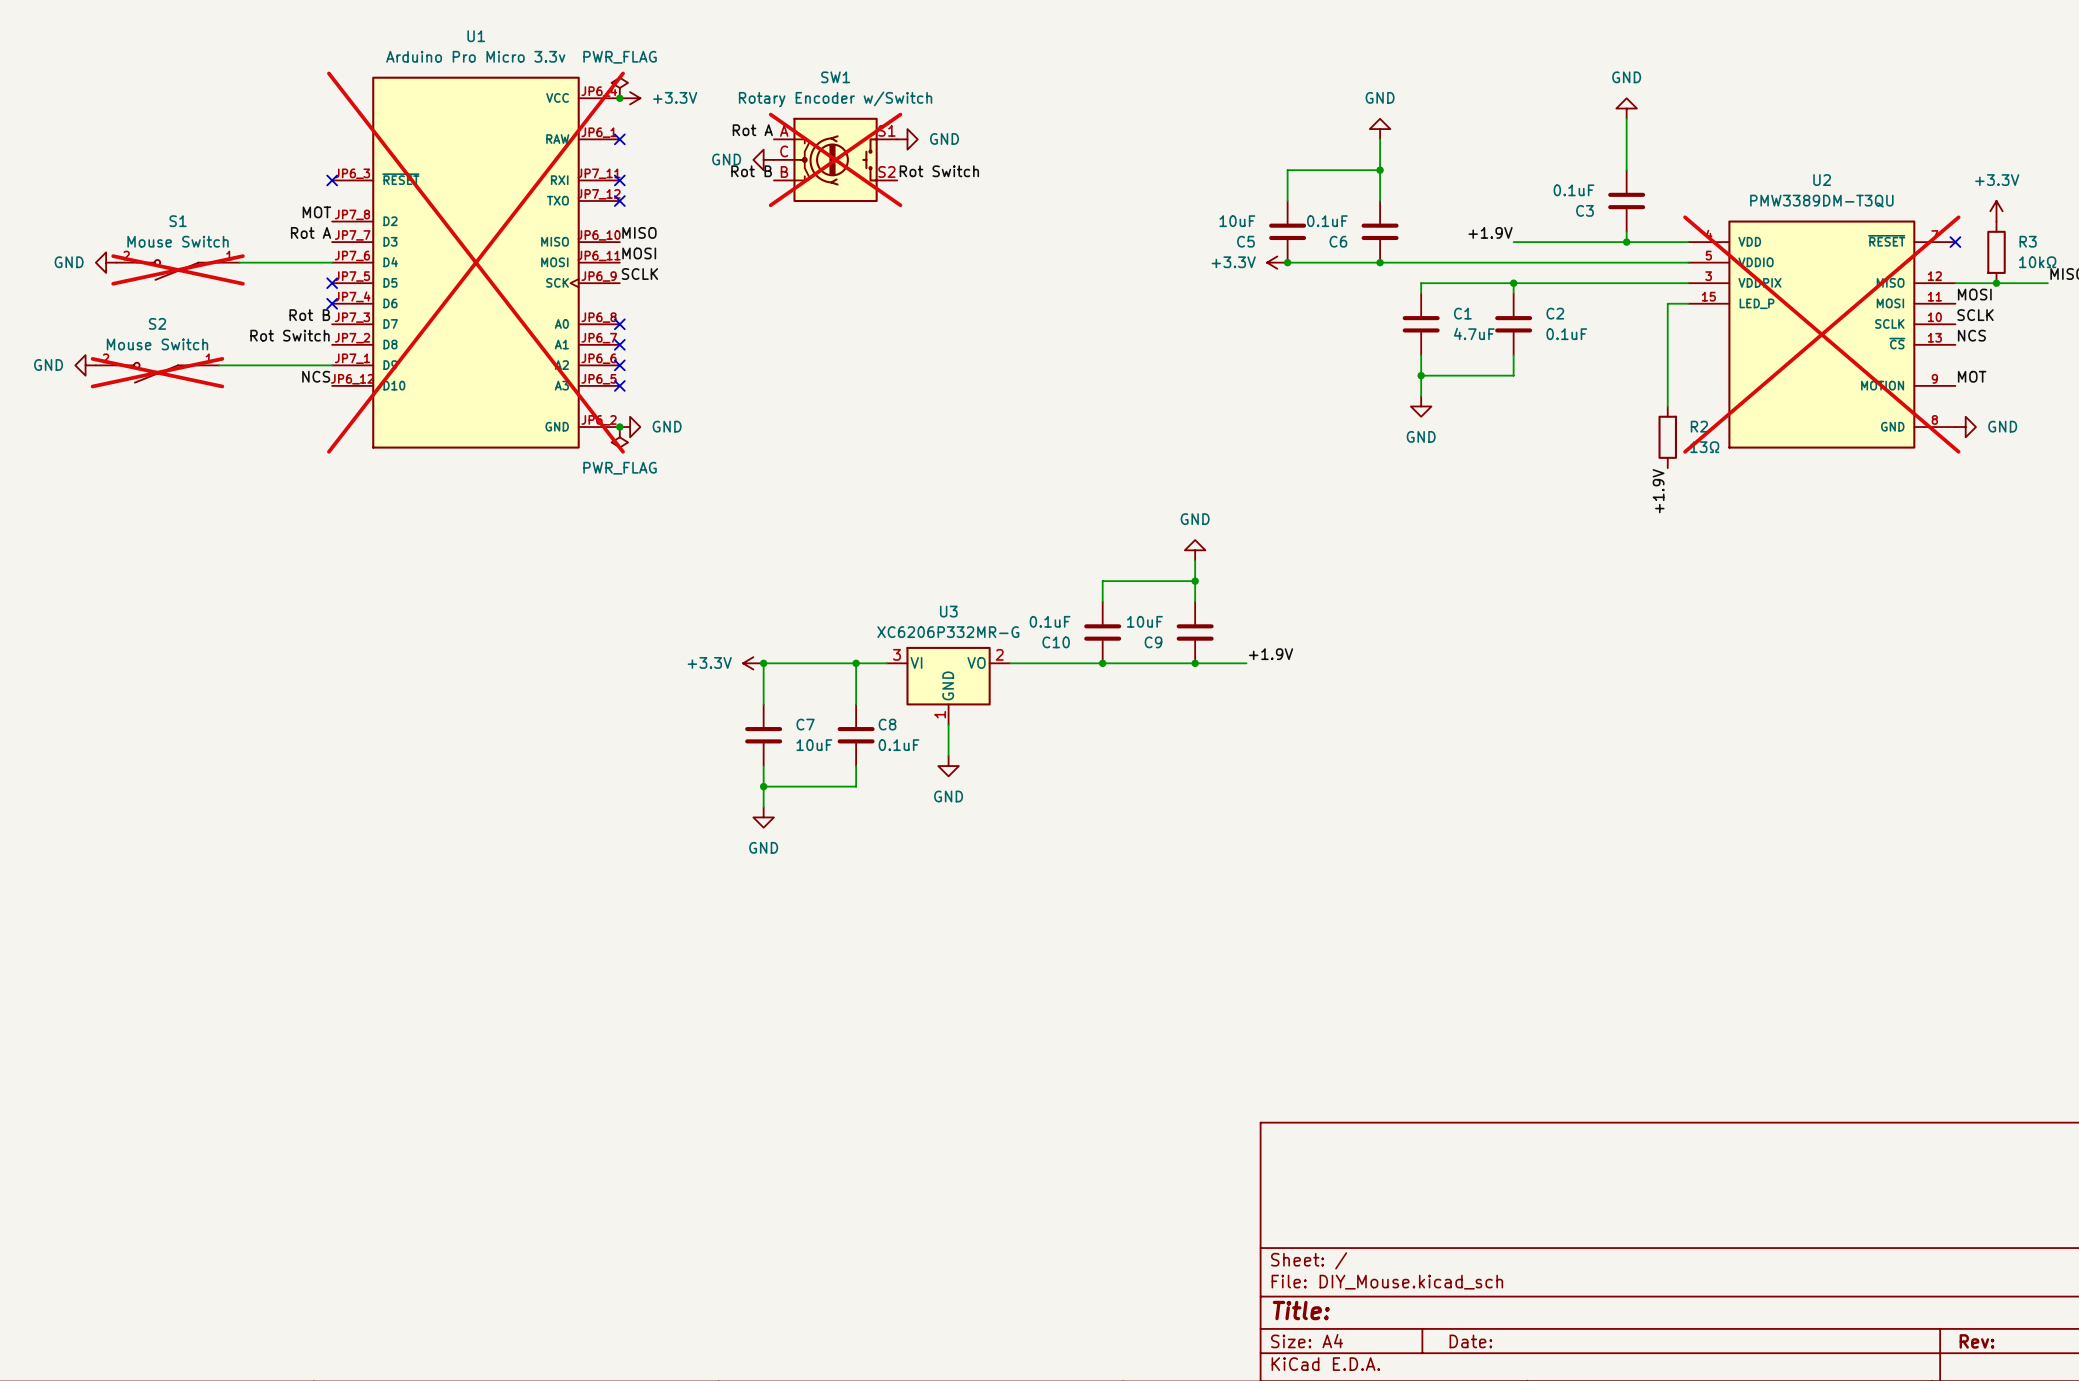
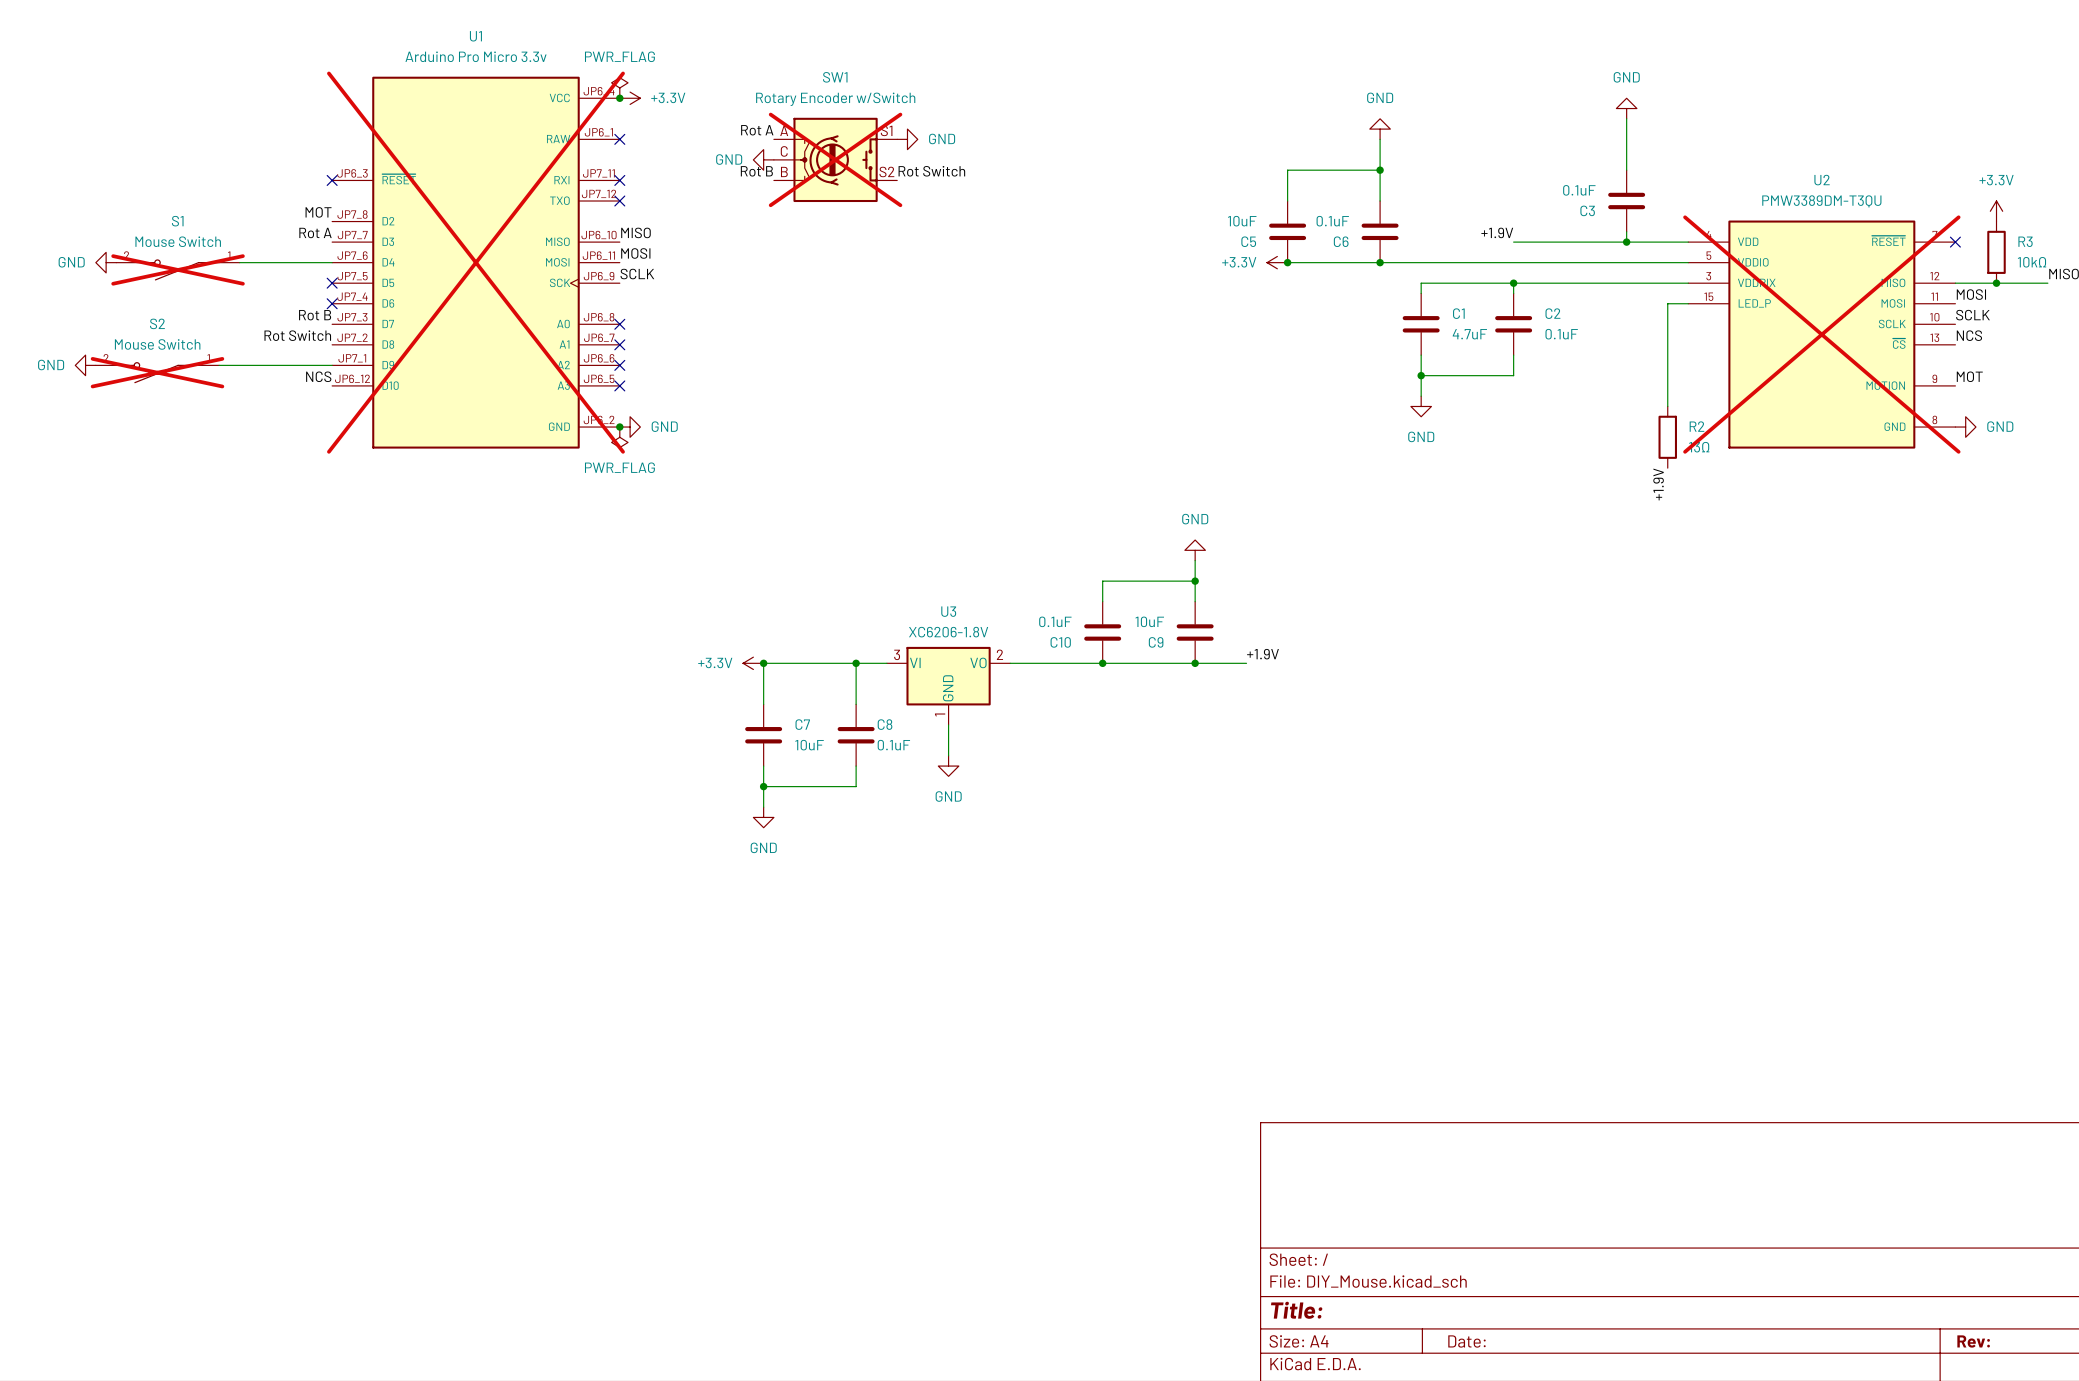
U3 value: XC6206P332MR-G (948, 632) -> XC6206-1.8V (948, 632)

